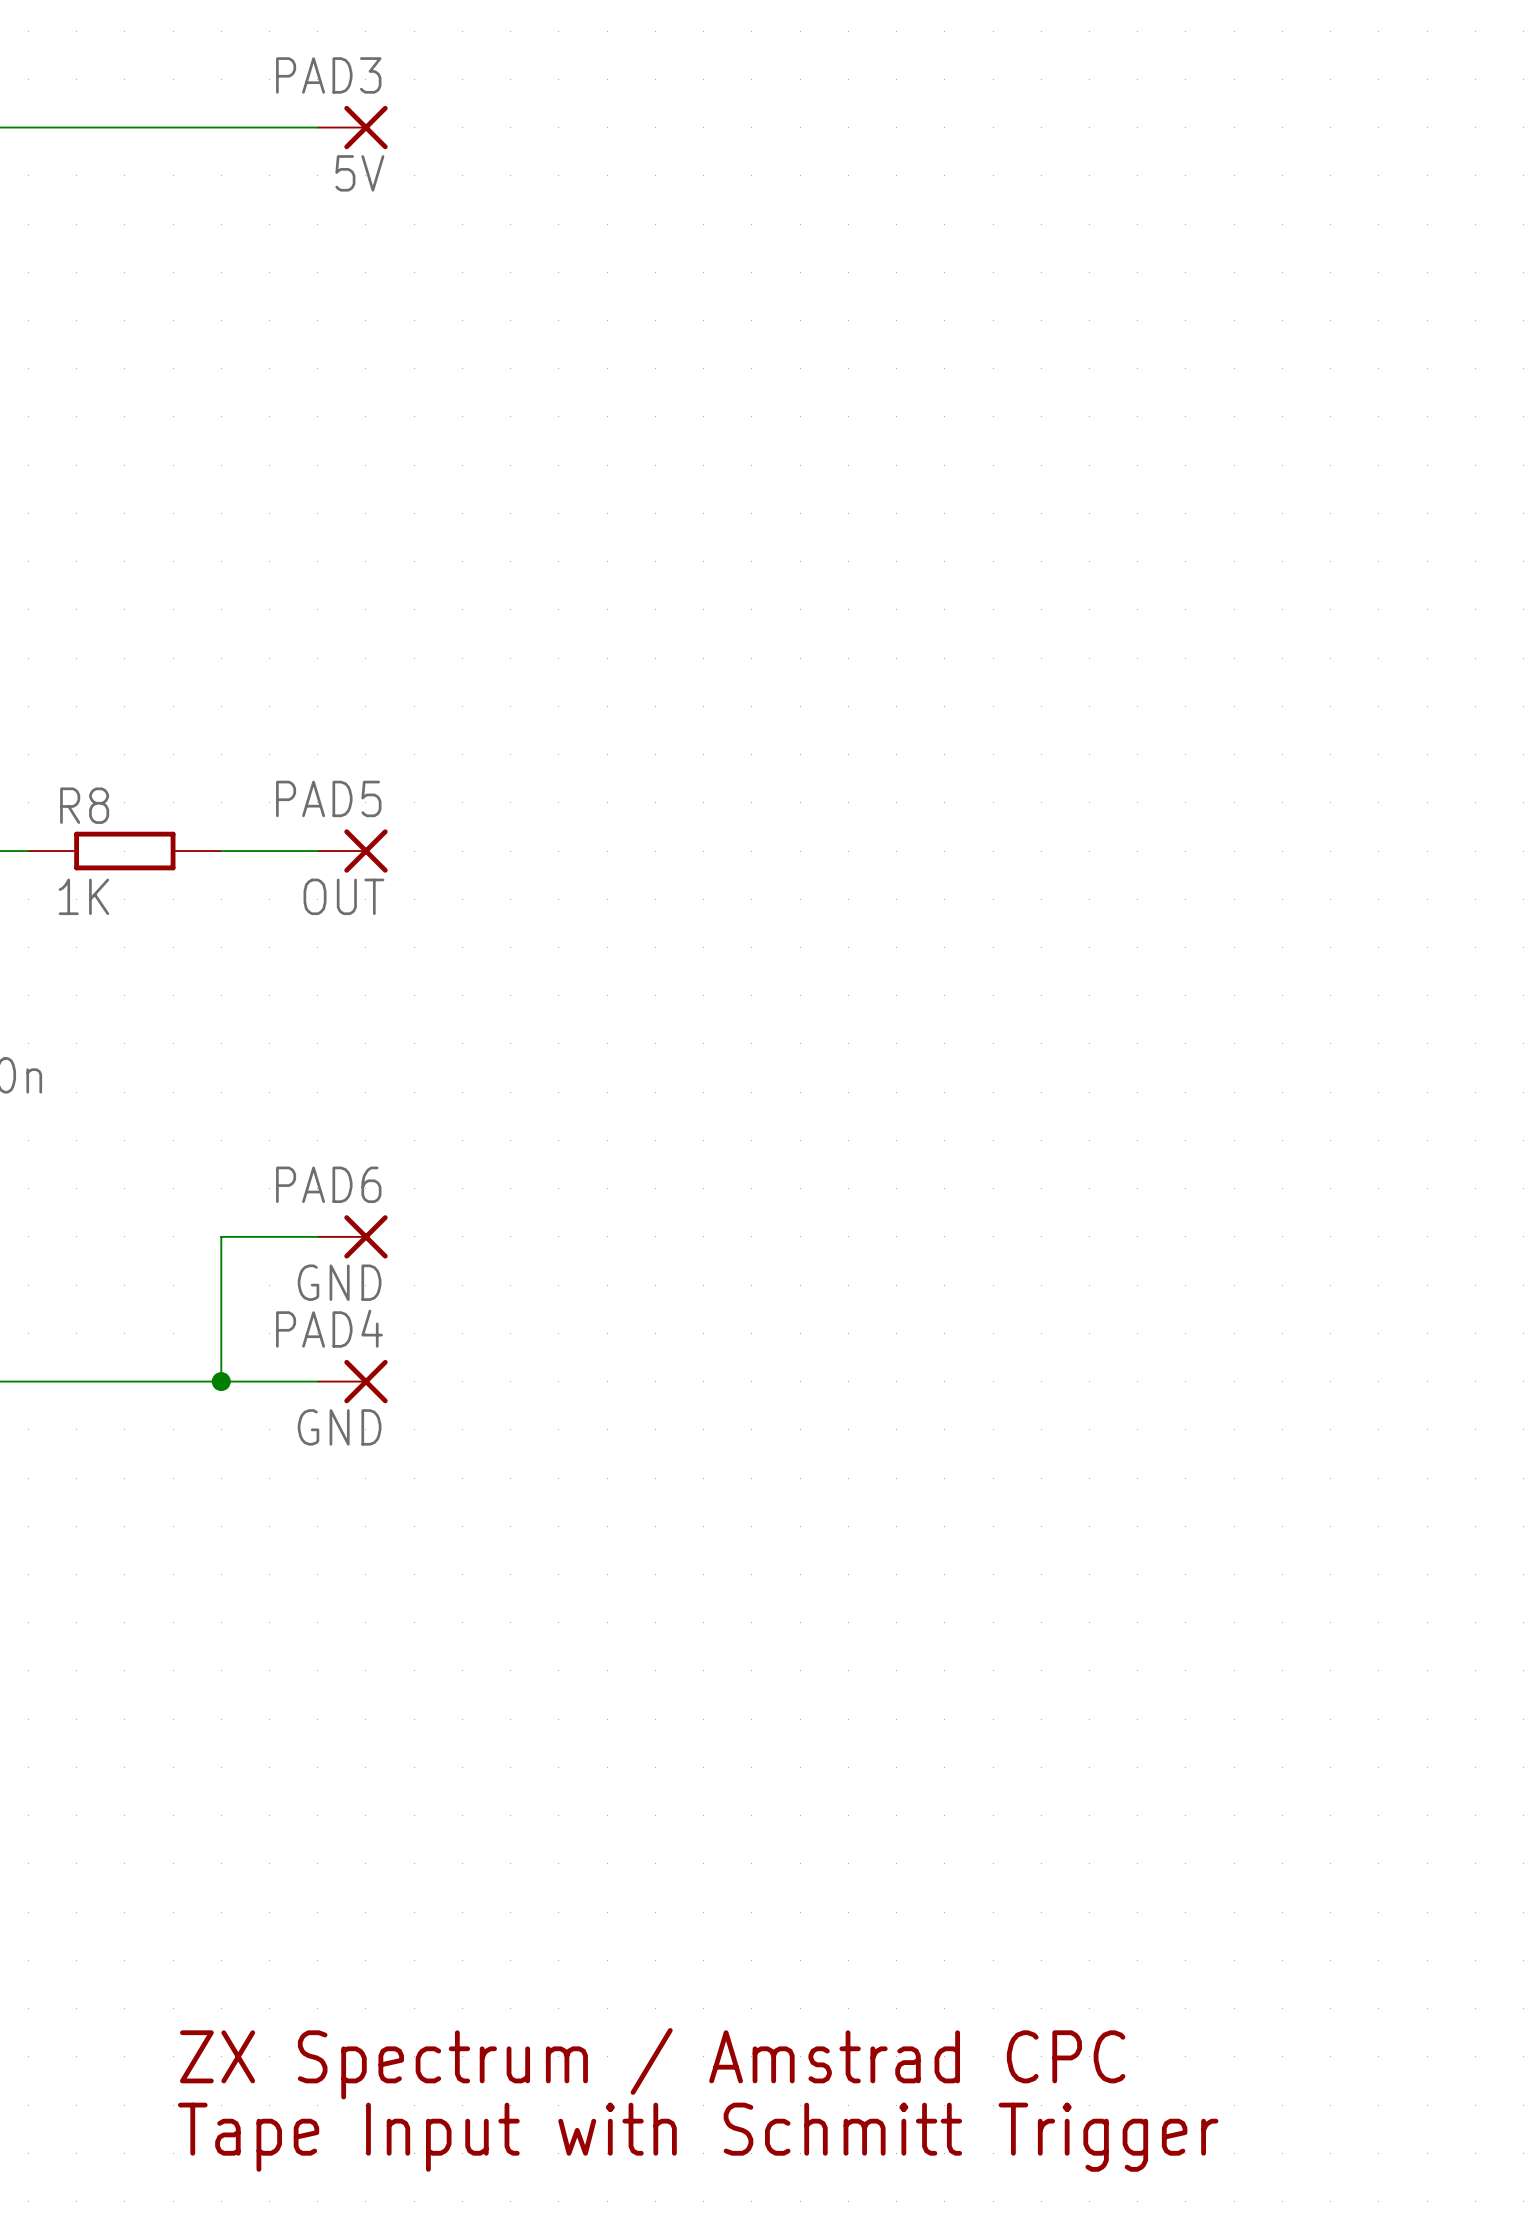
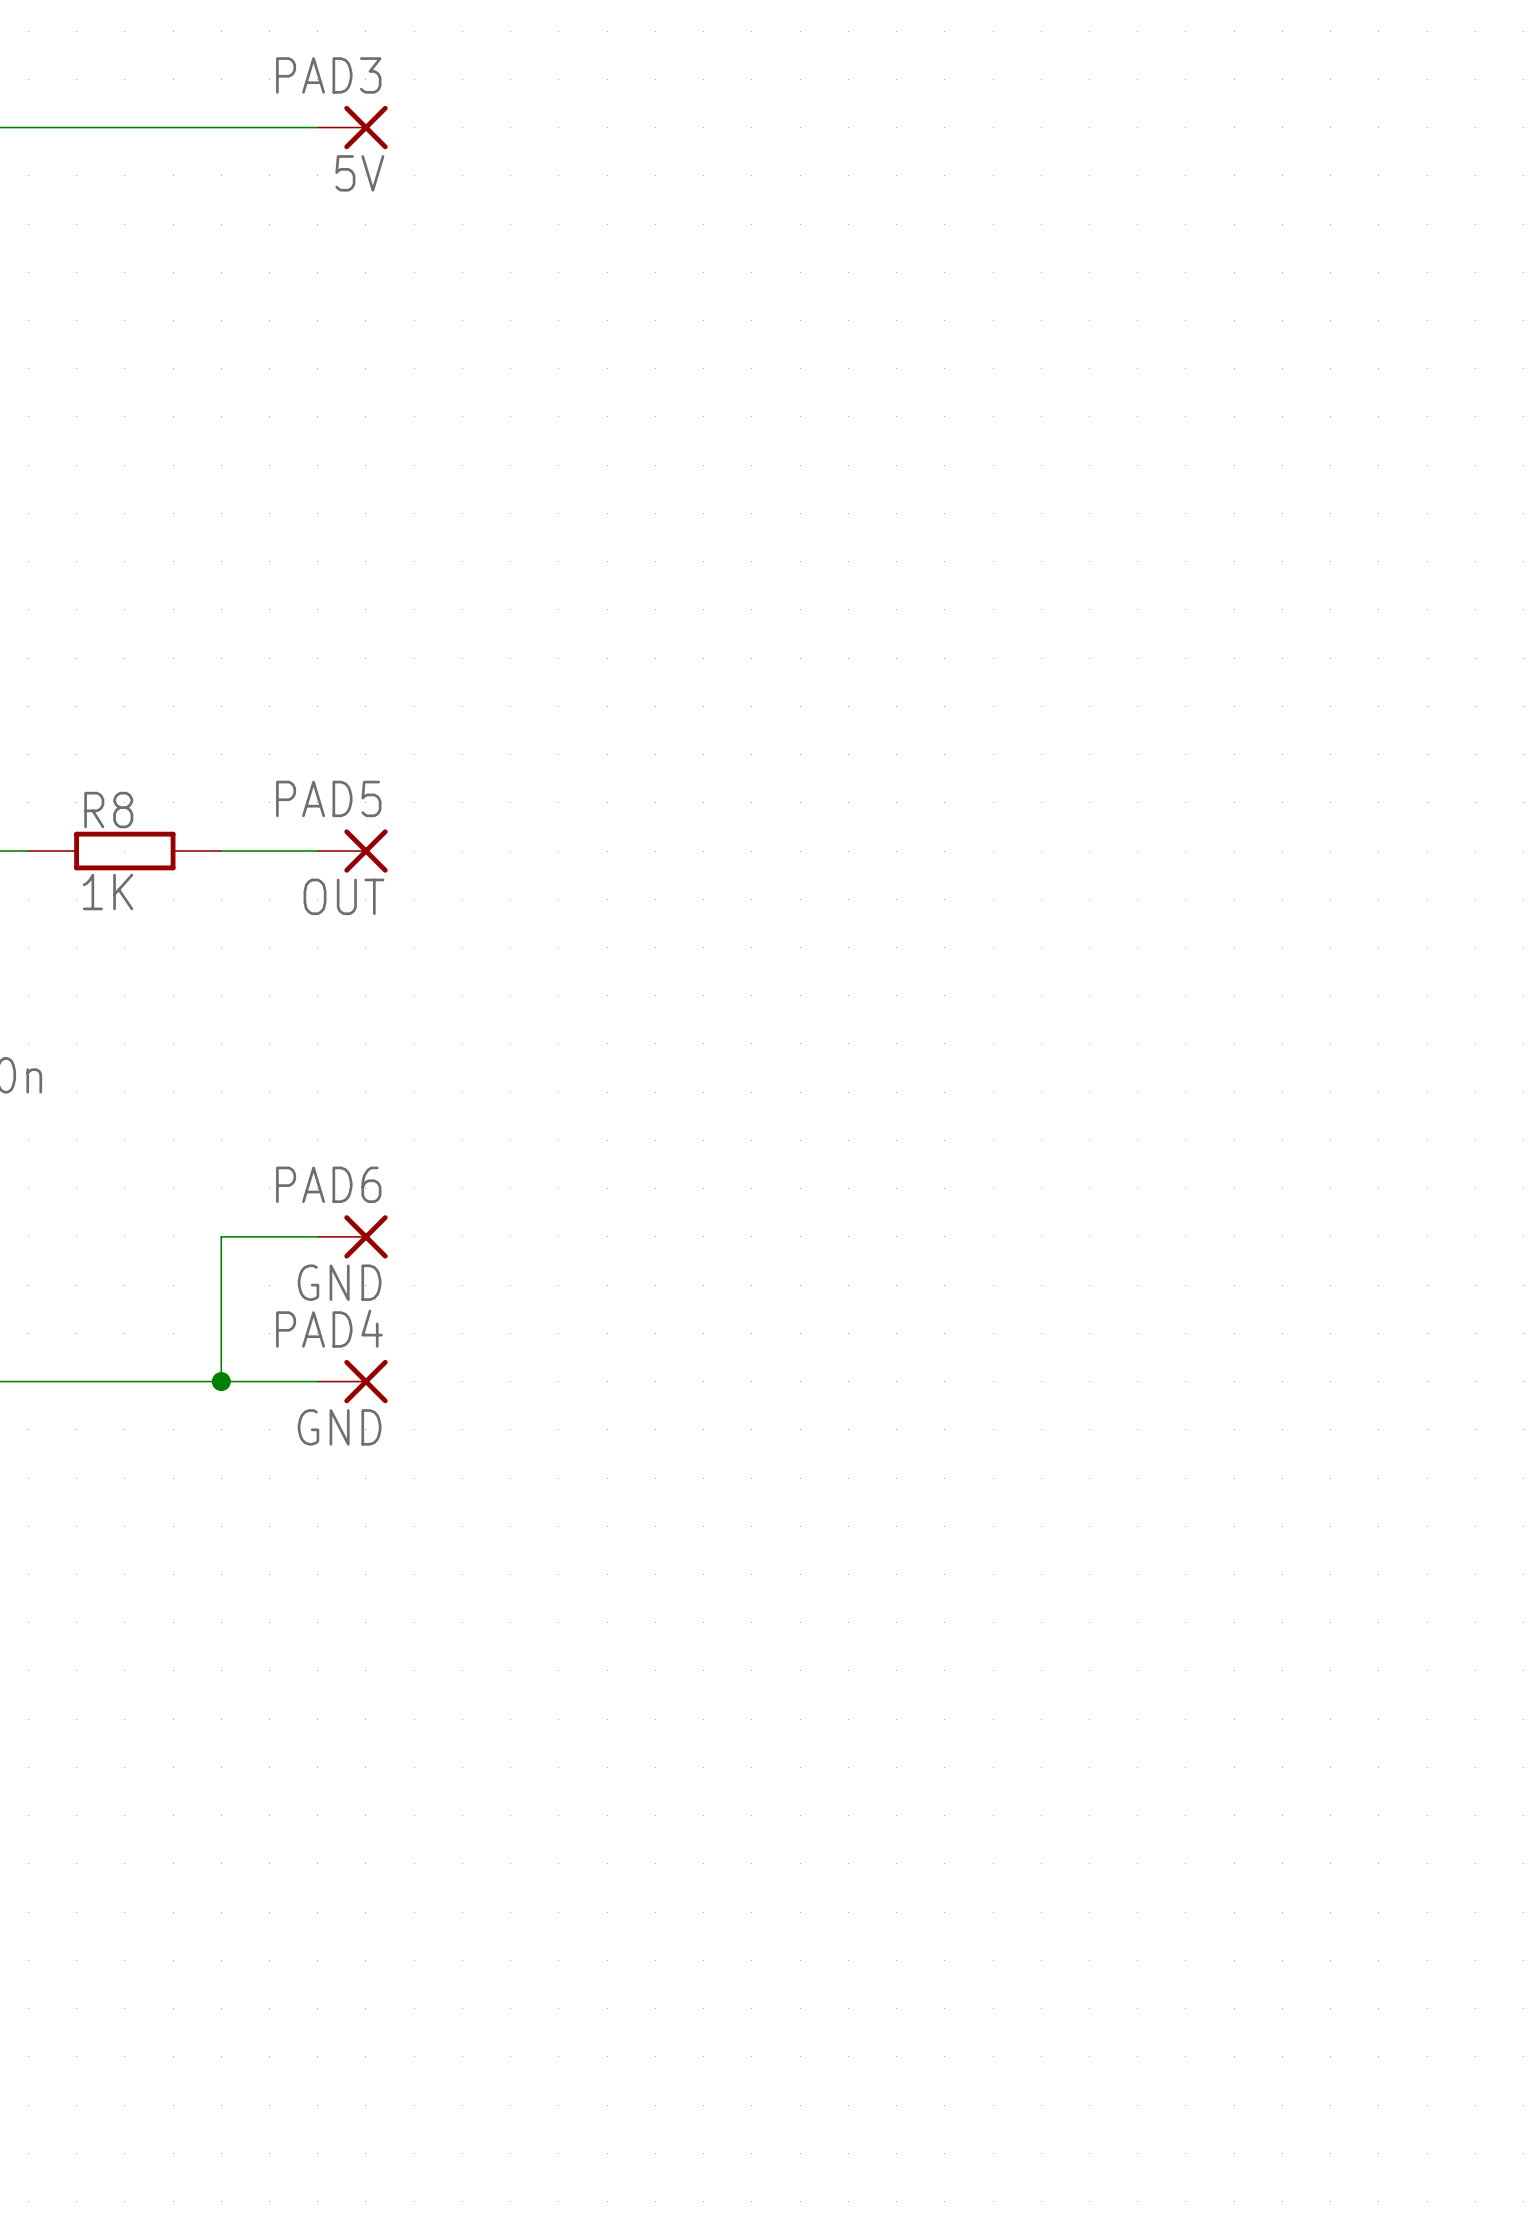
R8 name position: R8 (84, 805) -> R8 (108, 810)
R8 value position: 1K (83, 896) -> 1K (108, 892)
text: ZX Spectrum / Amstrad CPC (652, 2063) -> none
text: Tape Input with Schmitt Trigger (698, 2137) -> none

